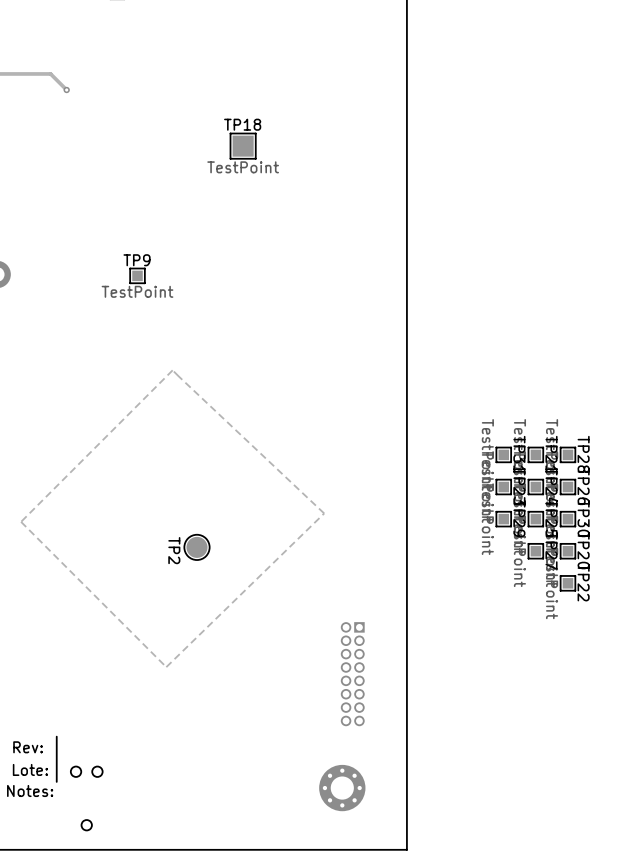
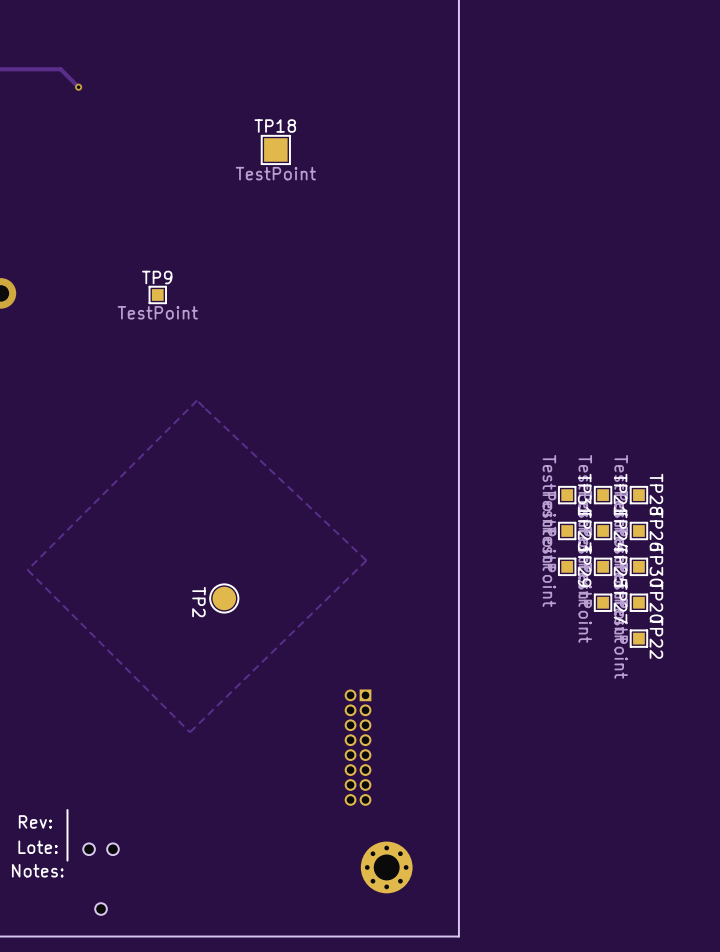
part position: (352, 674) -> (358, 747)

